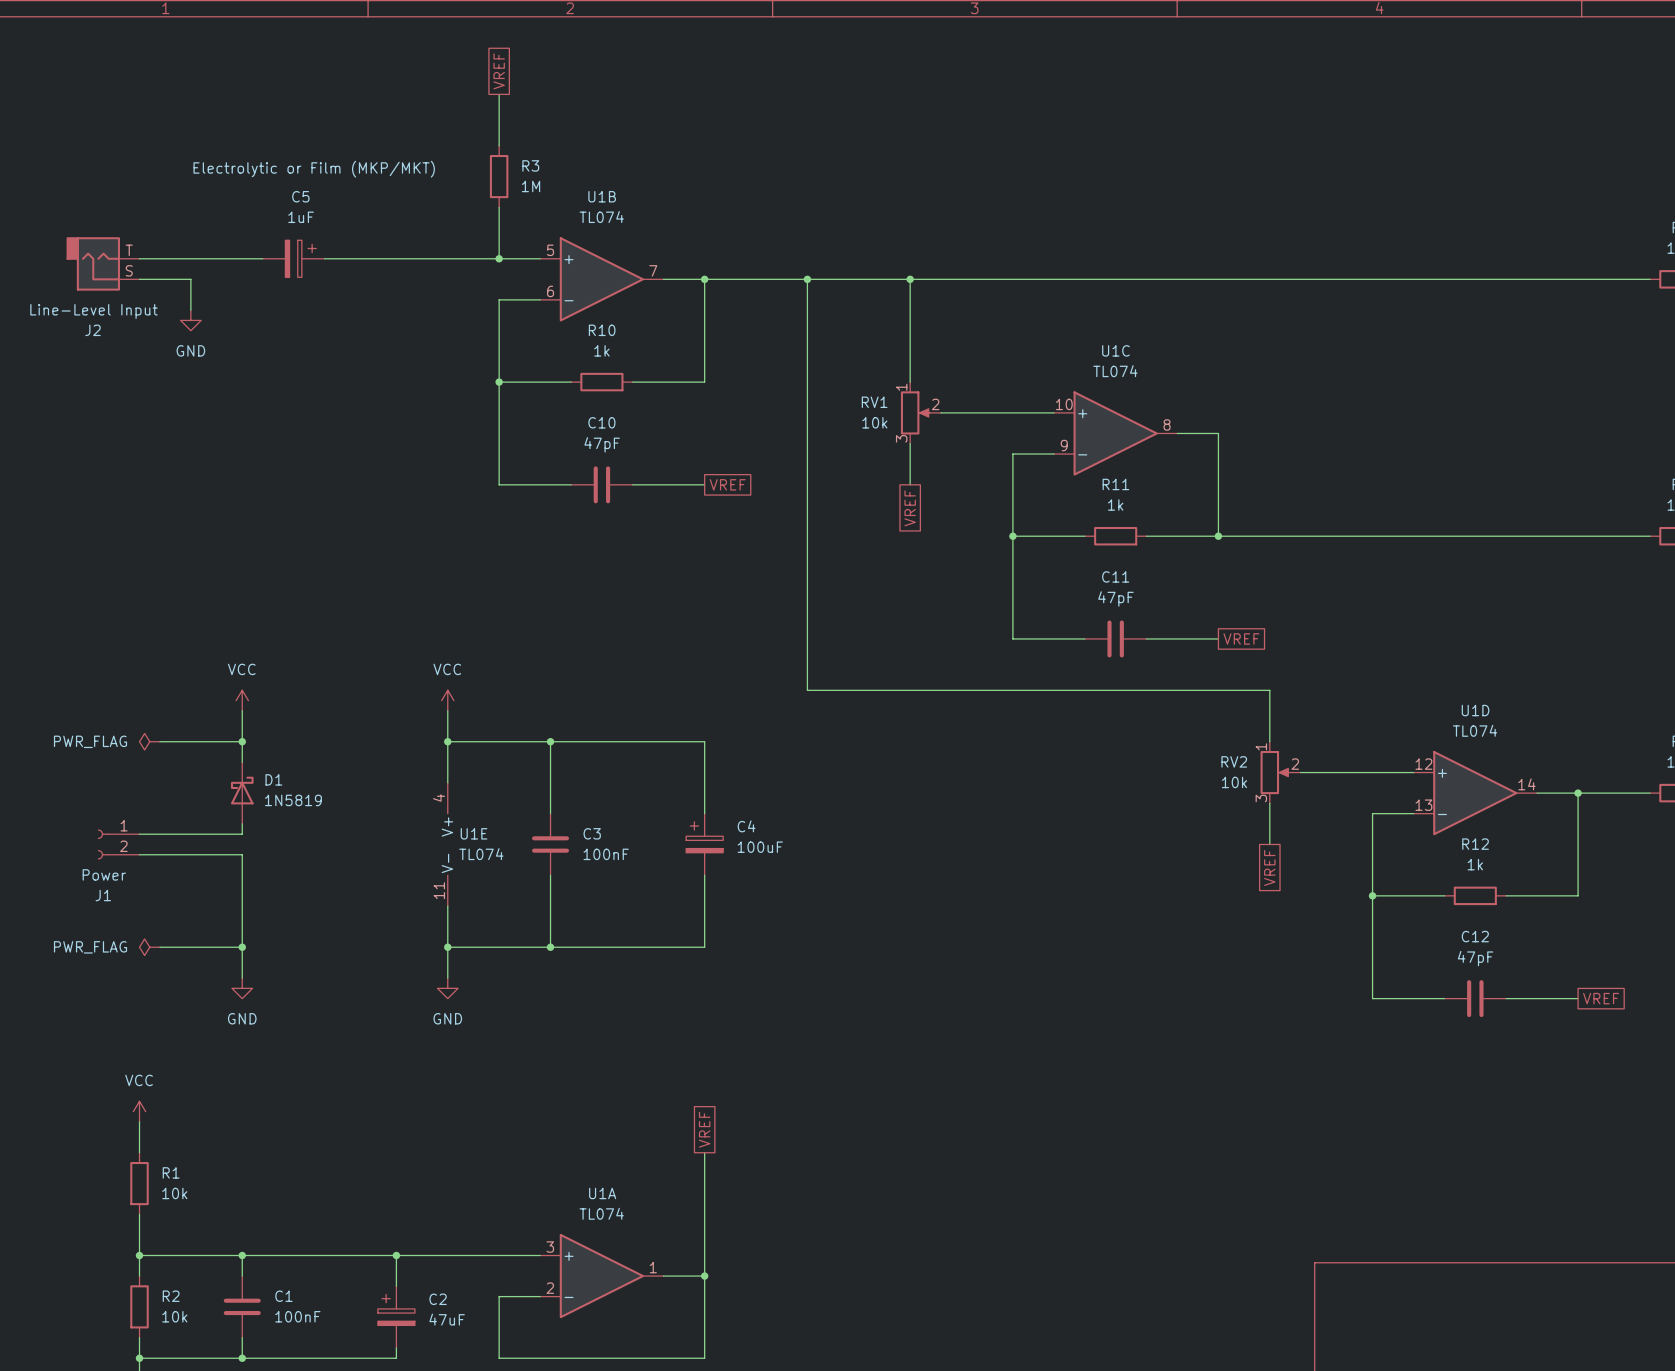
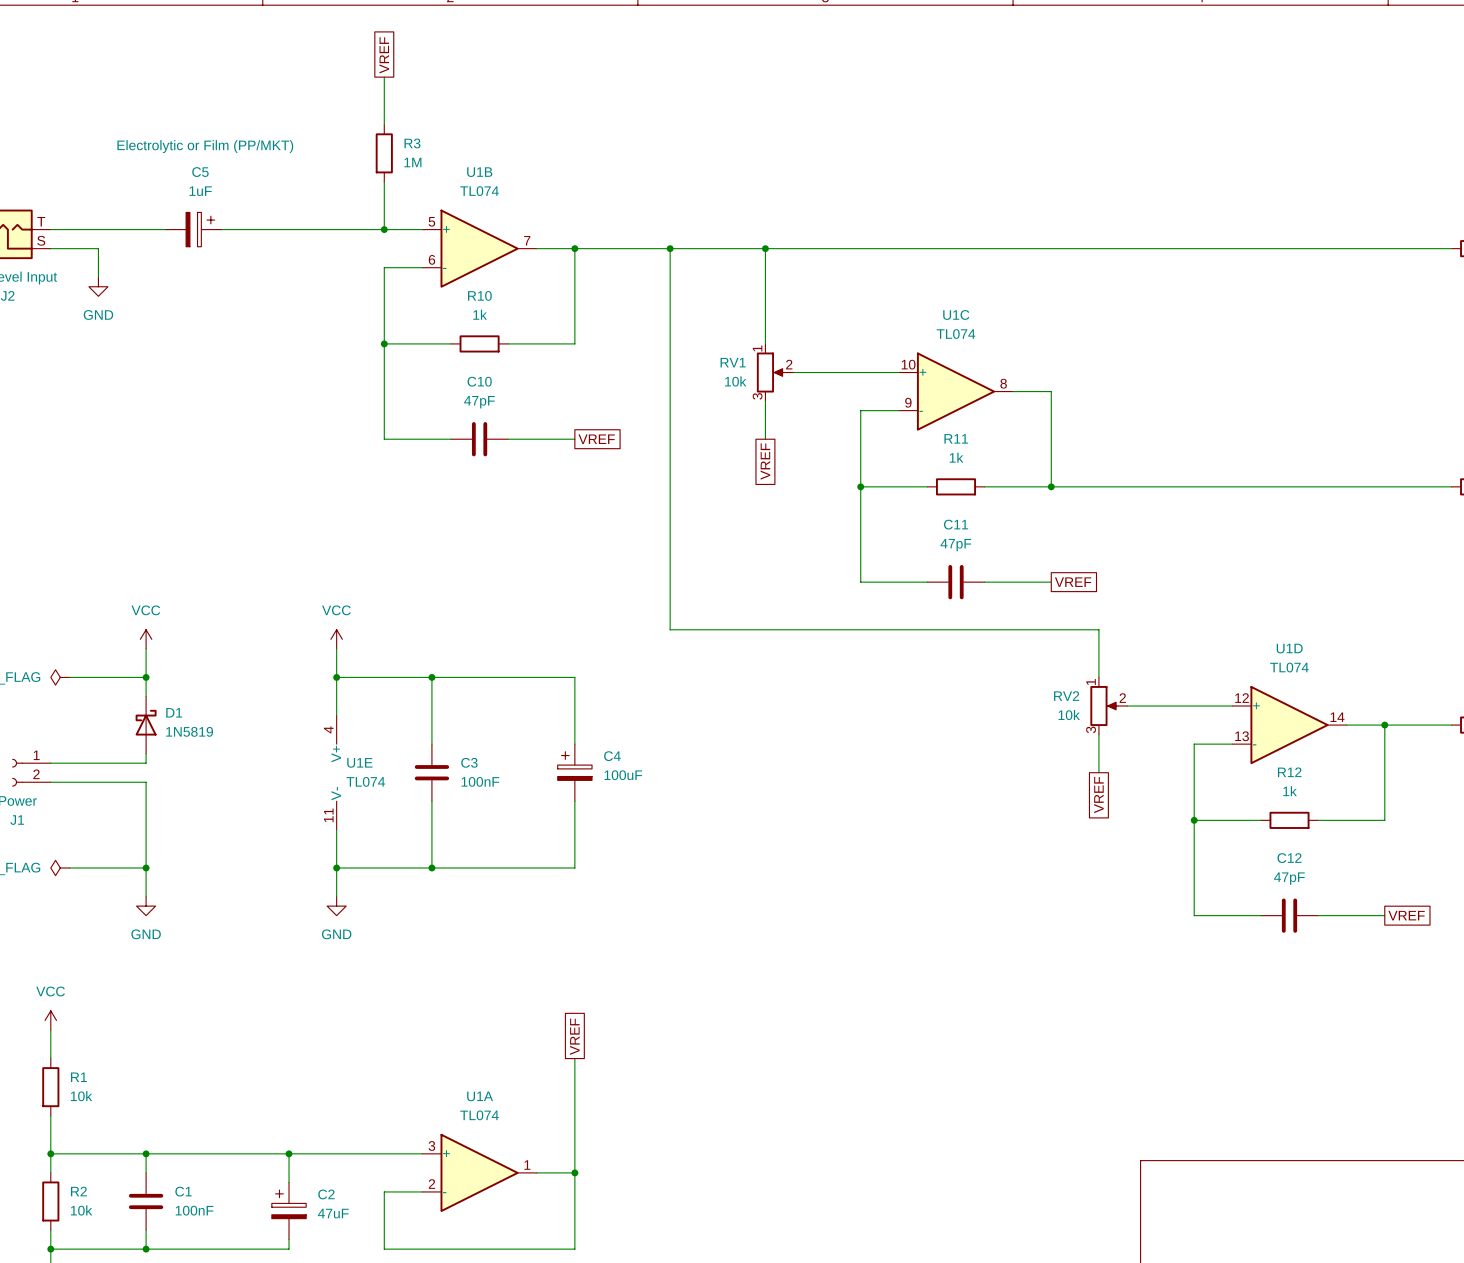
C5 text: Electrolytic or Film (MKP/MKT) (314, 169) -> Electrolytic or Film (PP/MKT) (205, 146)

